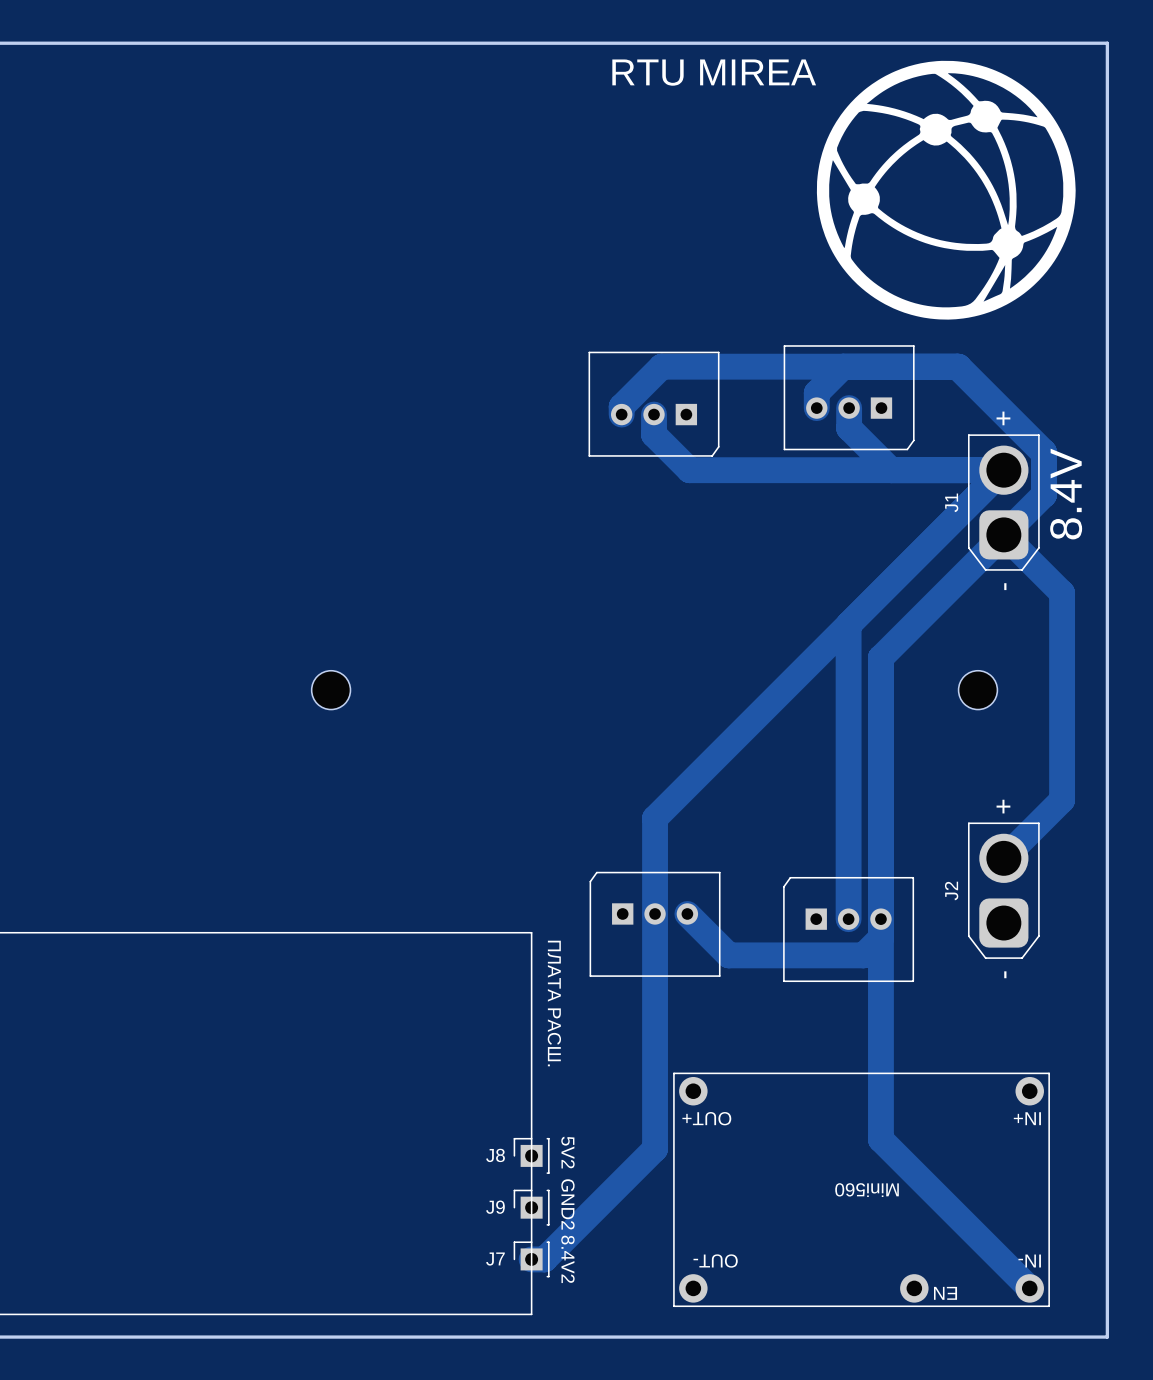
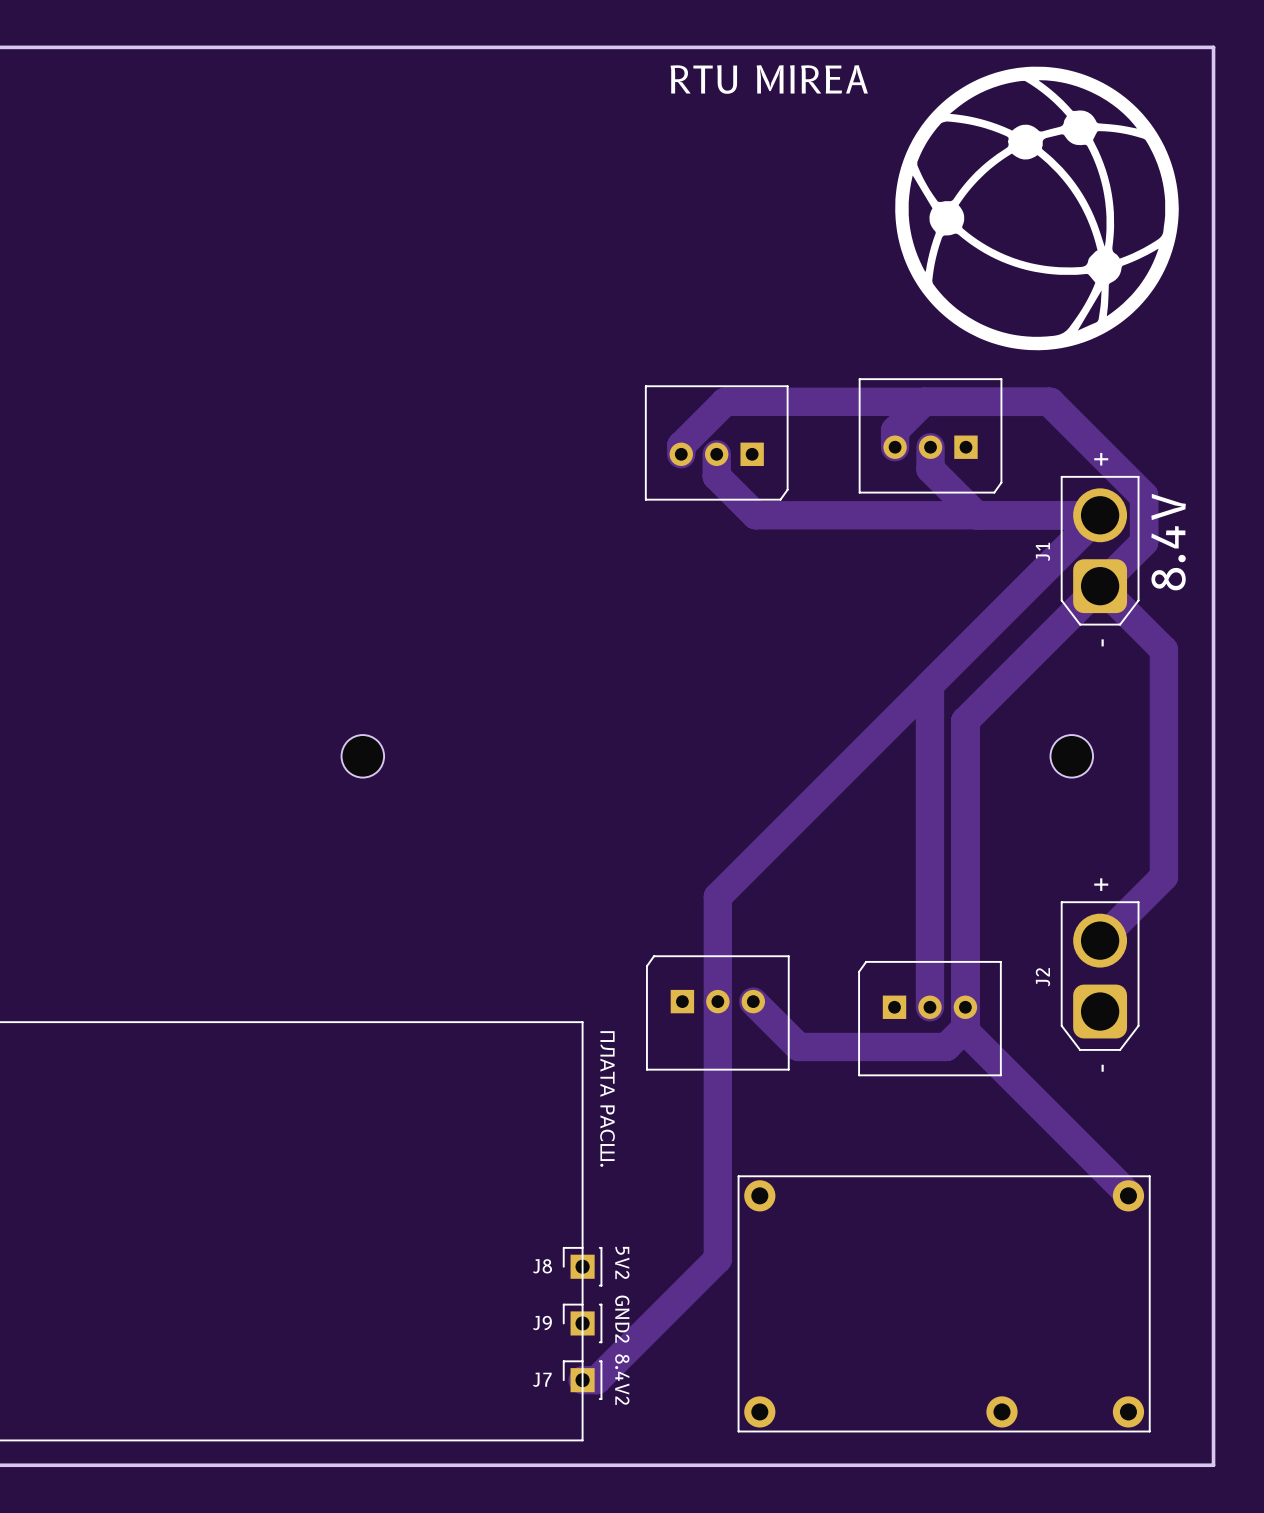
track: (880, 940) (880, 1139) (1029, 1288) -> (965, 1031) (1128, 1194)
text: OUT+ (706, 1118) -> none
text: IN+ (1027, 1118) -> none
text: Mini560 (867, 1190) -> none
text: OUT- (715, 1261) -> none
text: IN- (1029, 1261) -> none
text: EN (945, 1293) -> none

